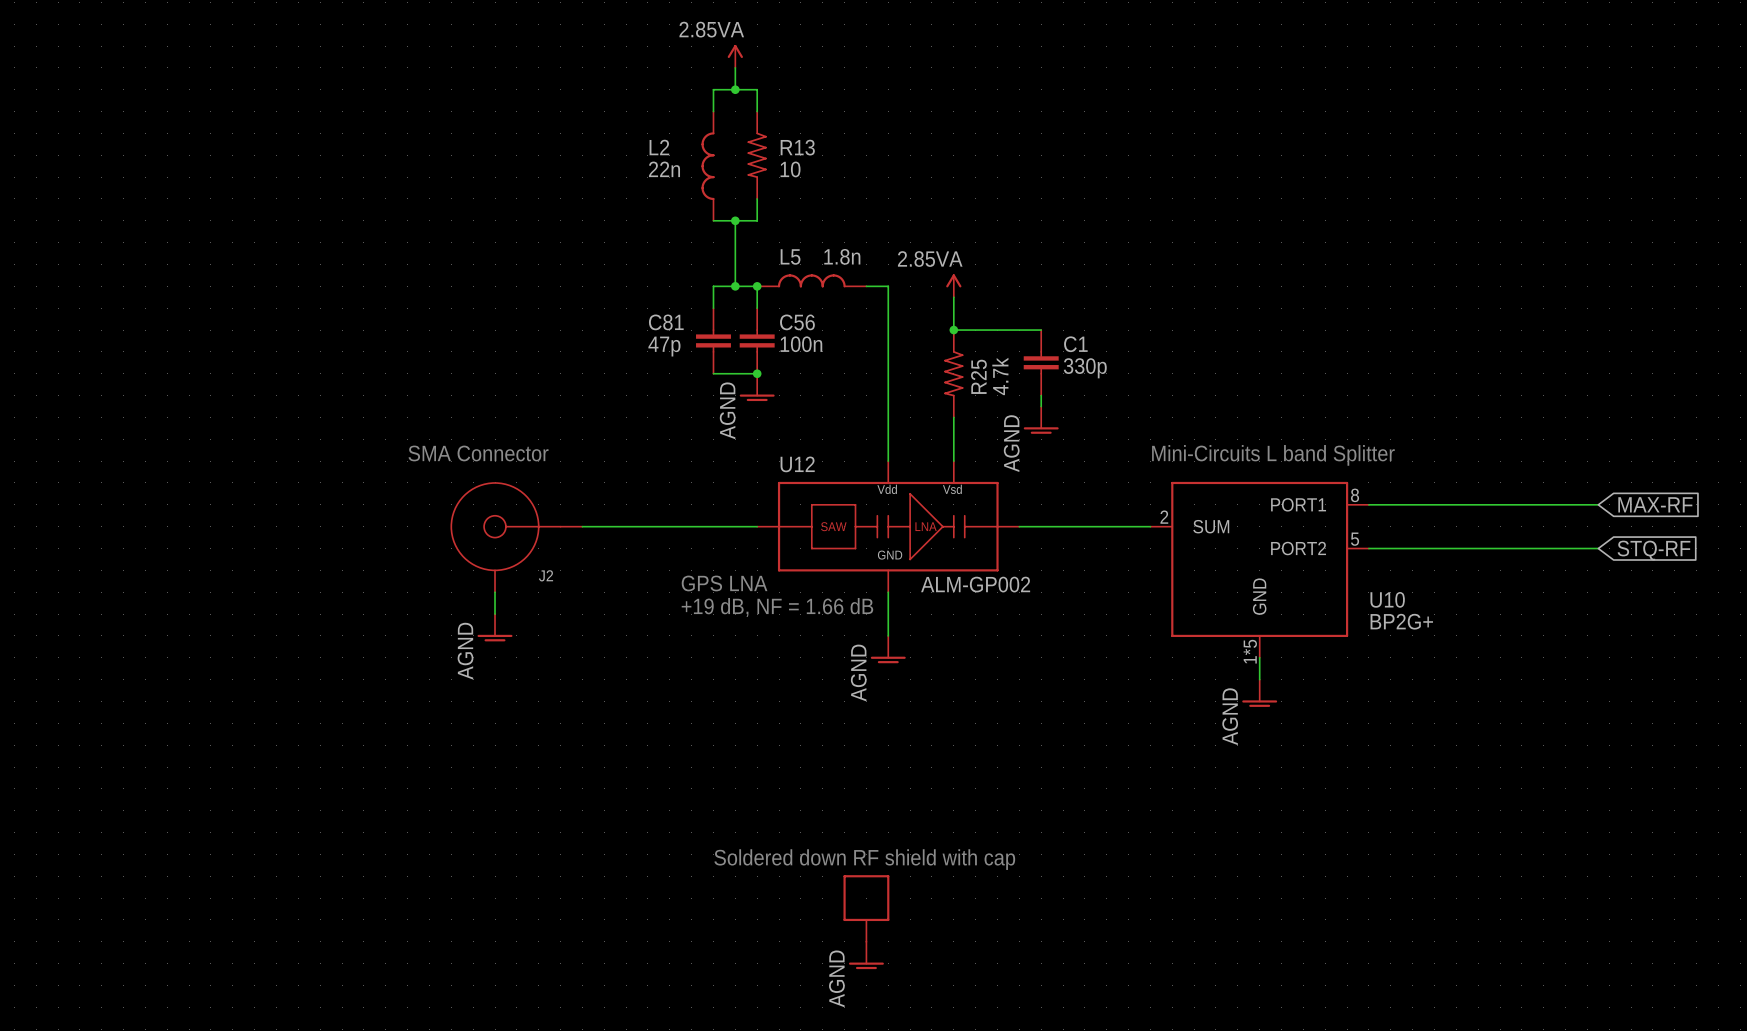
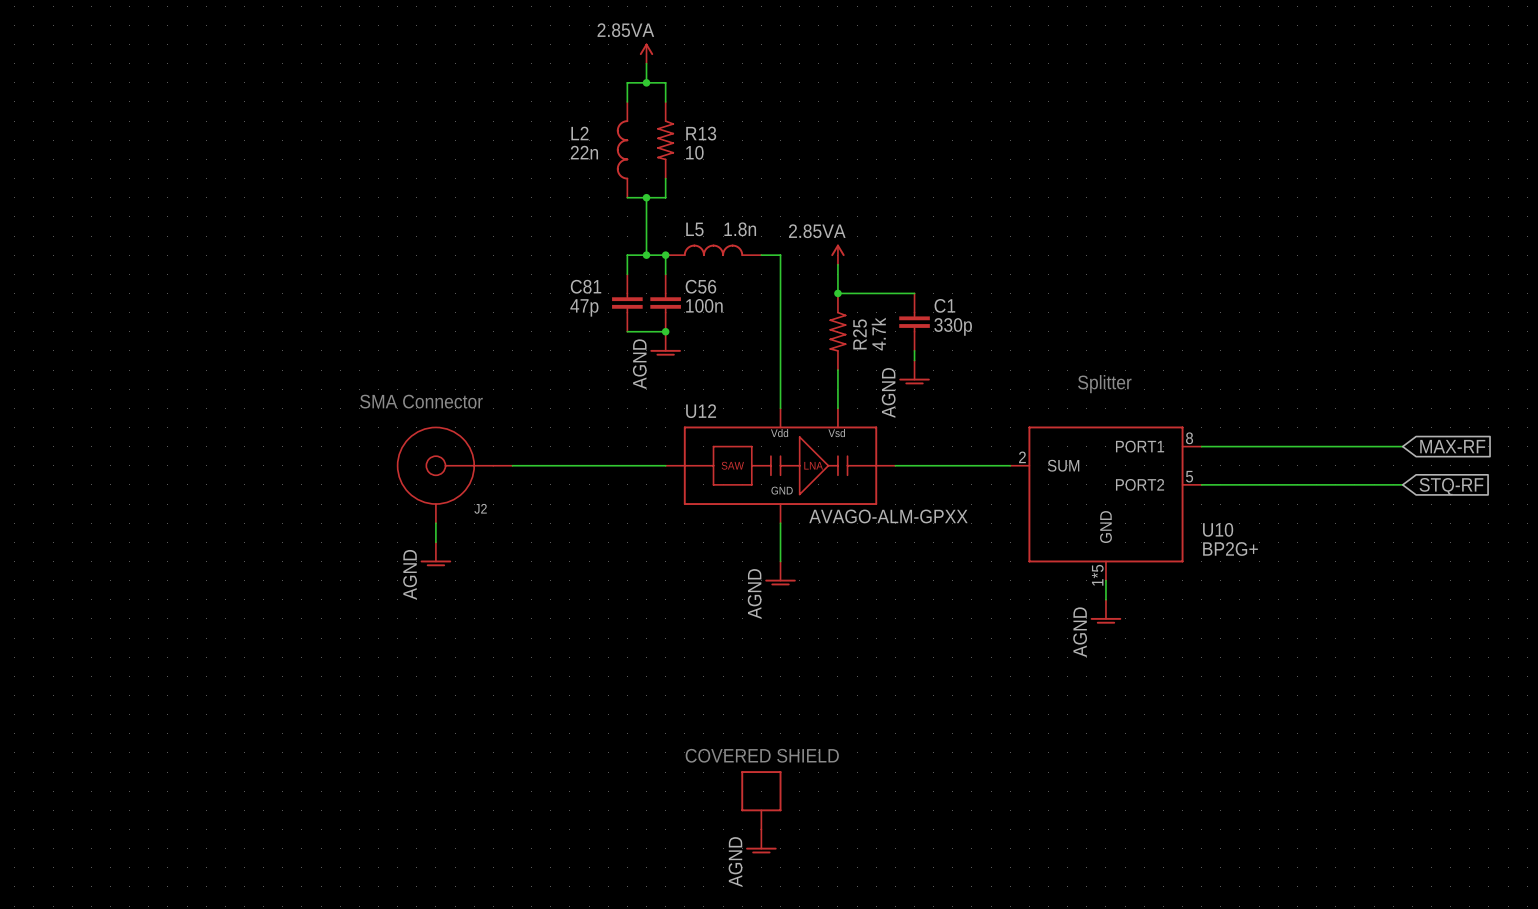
text: none -> Splitter (1104, 384)
text: Mini-Circuits L band Splitter (1273, 455) -> none
text: GPS LNA (724, 583) -> none
U12 value: ALM-GP002 (975, 584) -> AVAGO-ALM-GPXX (888, 516)
text: +19 dB, NF = 1.66 dB (777, 607) -> none
text: none -> COVERED SHIELD (762, 755)
text: Soldered down RF shield with cap (864, 859) -> none

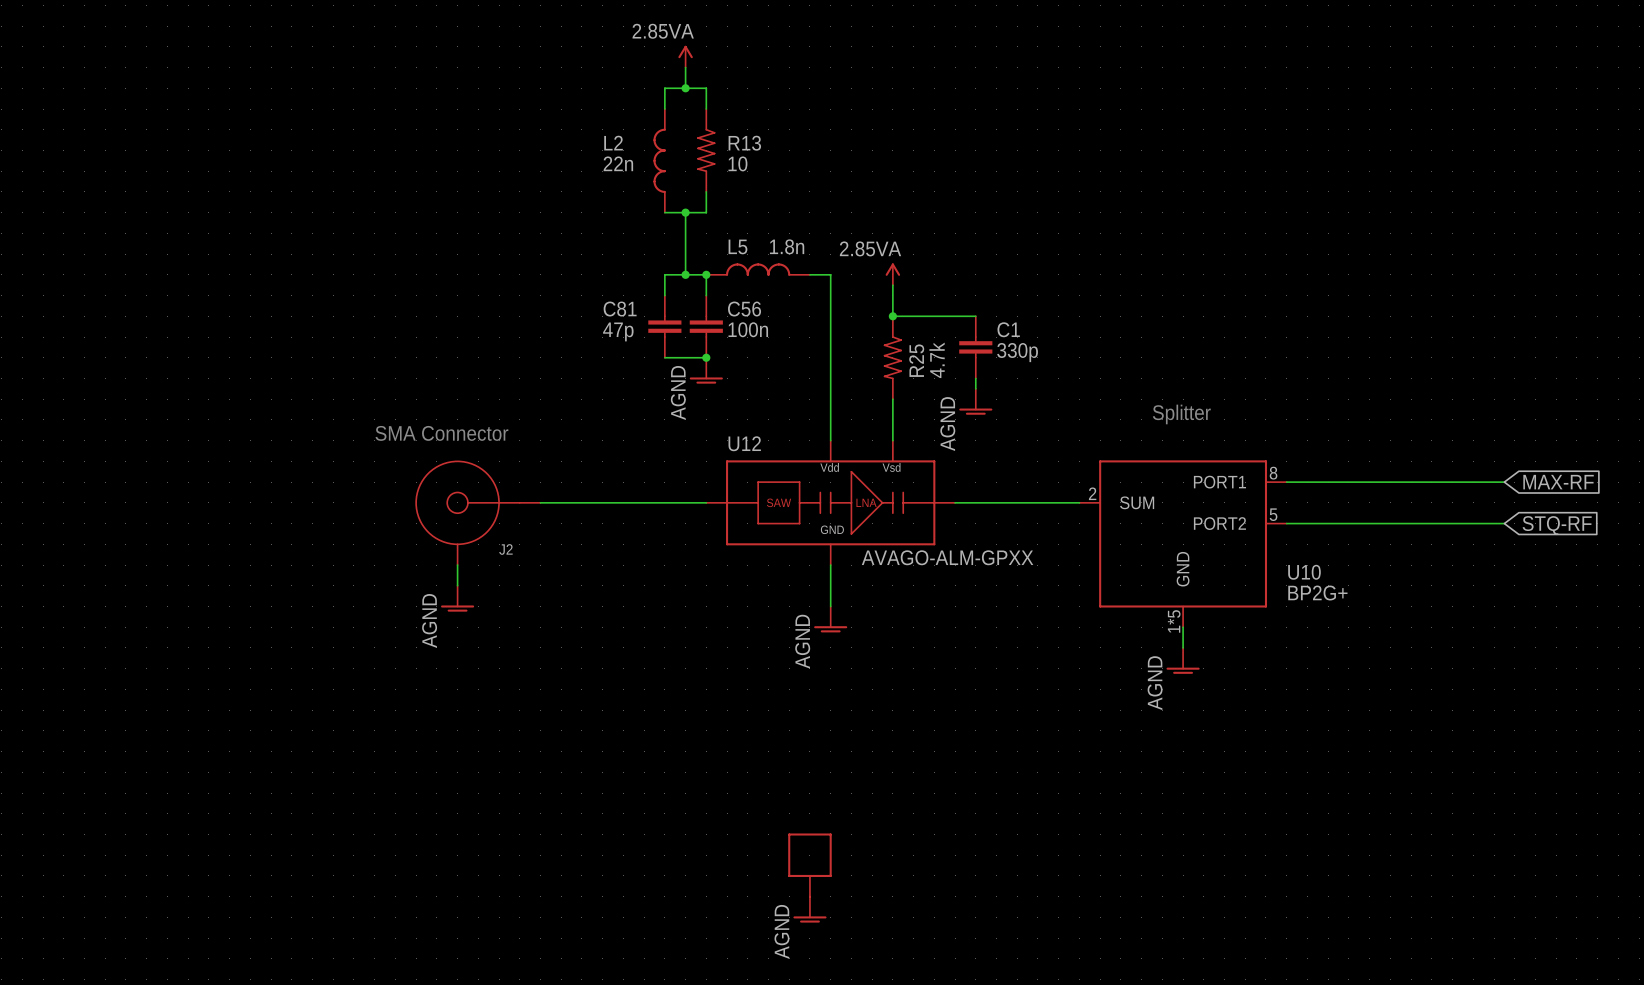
text: COVERED SHIELD (762, 755) -> none

